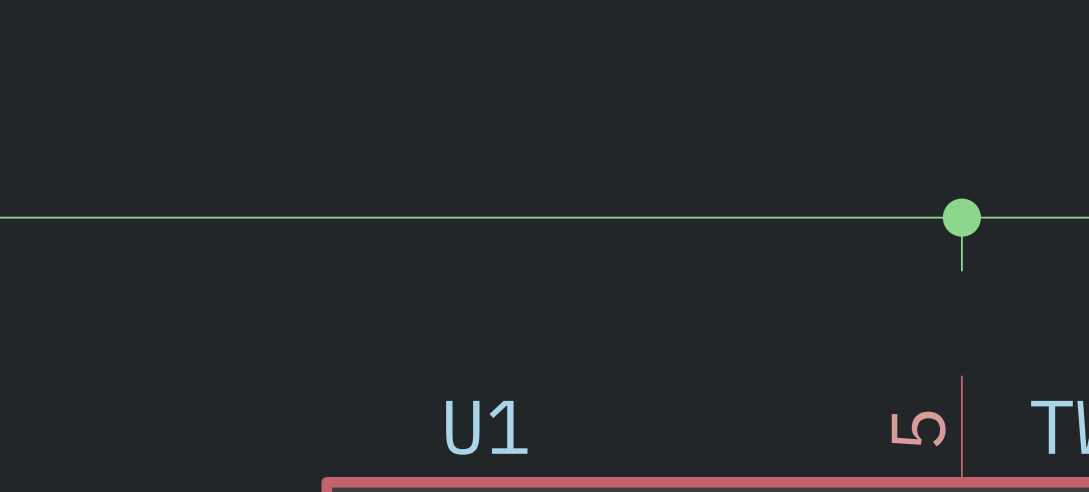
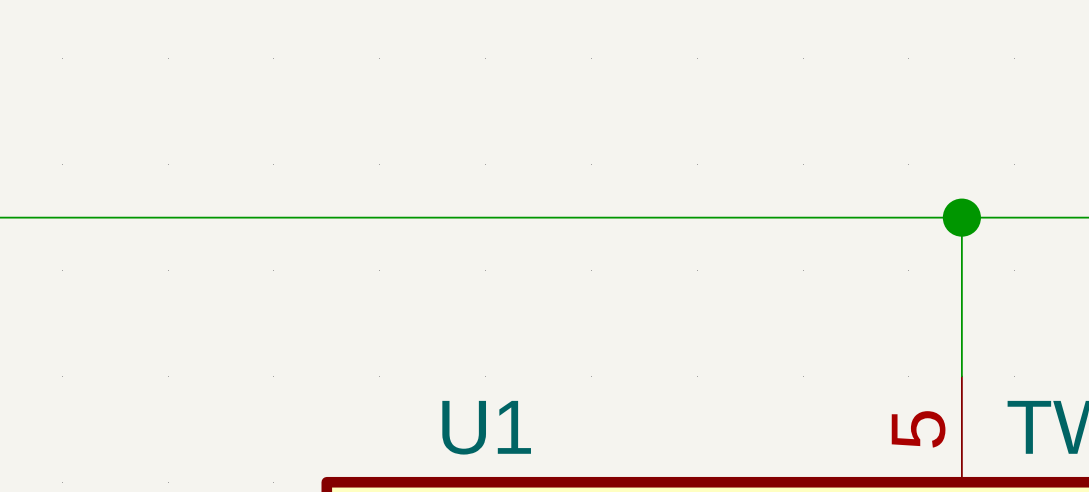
wire: none -> (961, 270) (961, 376)

